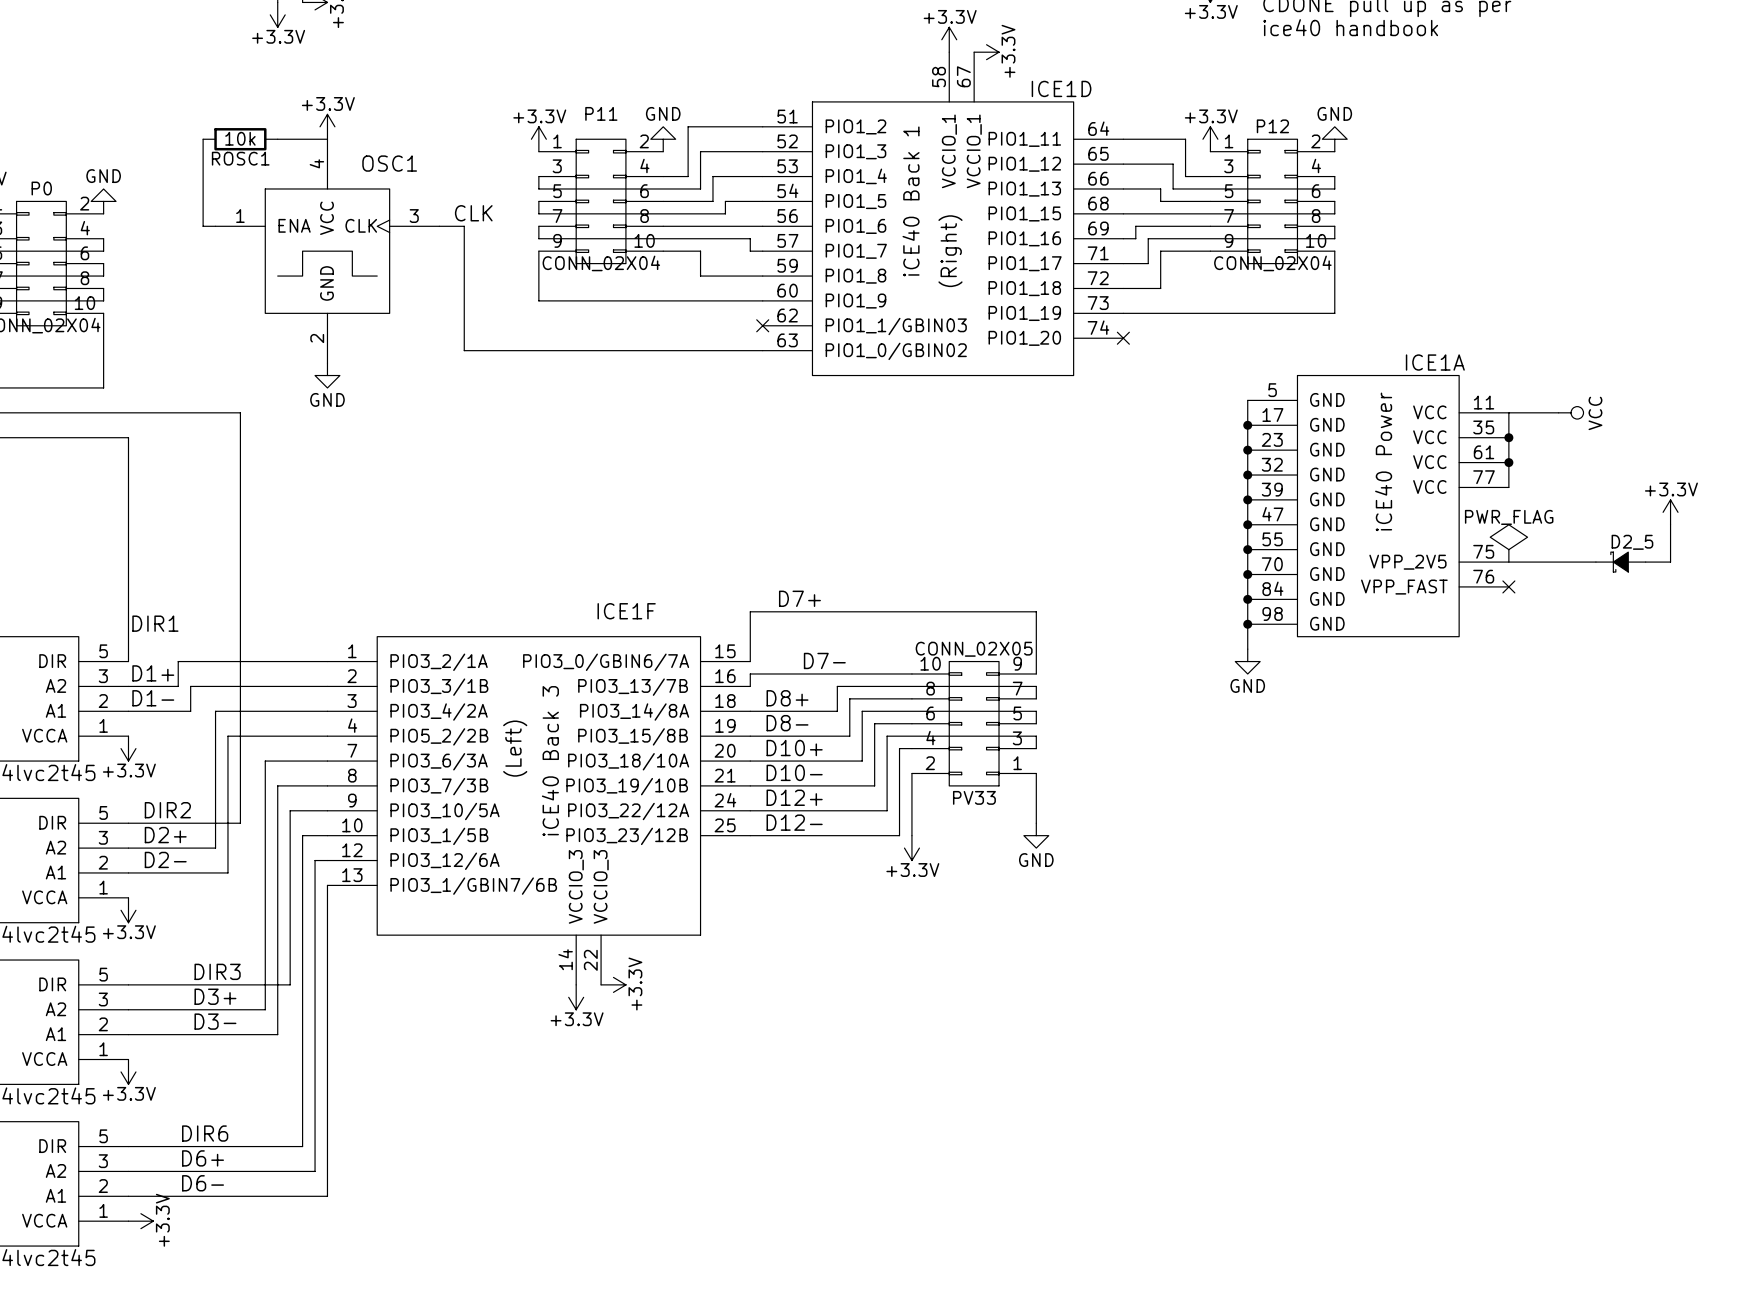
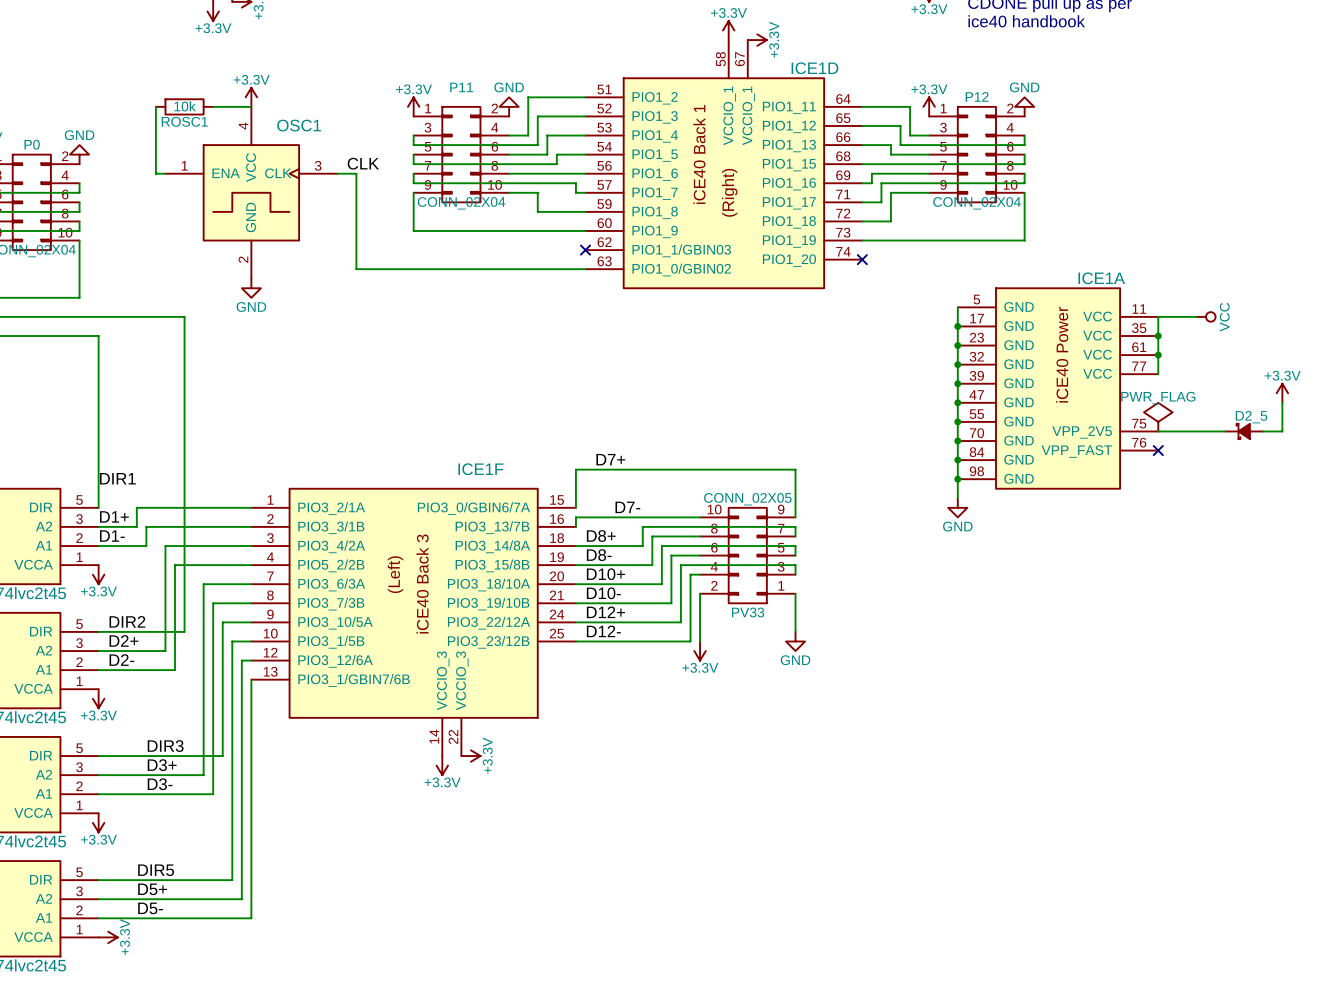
label: DIR6 (205, 1133) -> DIR5 (156, 870)
label: D6+ (203, 1158) -> D5+ (152, 889)
label: D6- (203, 1183) -> D5- (150, 908)

